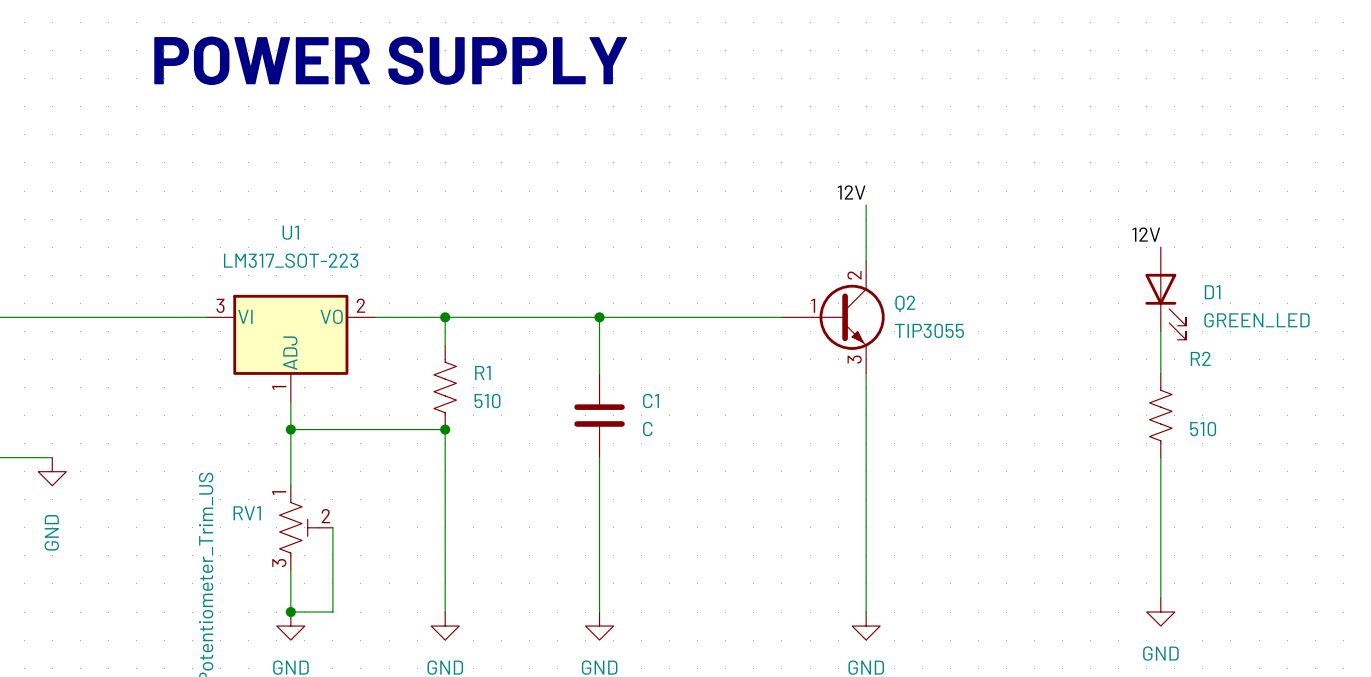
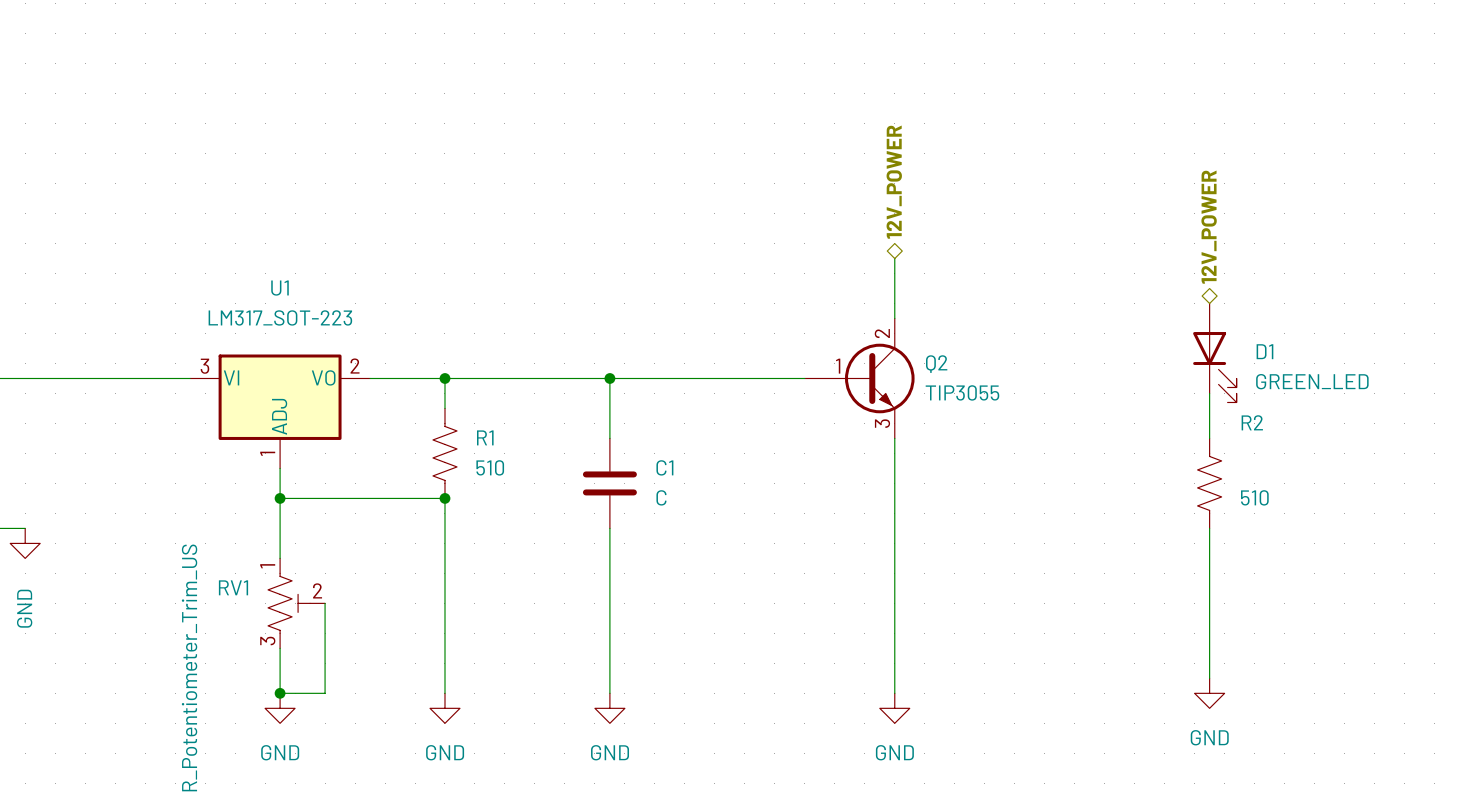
text: POWER SUPPLY (390, 60) -> none
hierarchical label: none -> 12V_POWER (894, 182)
hierarchical label: none -> 12V_POWER (1209, 227)
label: 12V (851, 192) -> none
label: 12V (1146, 234) -> none

